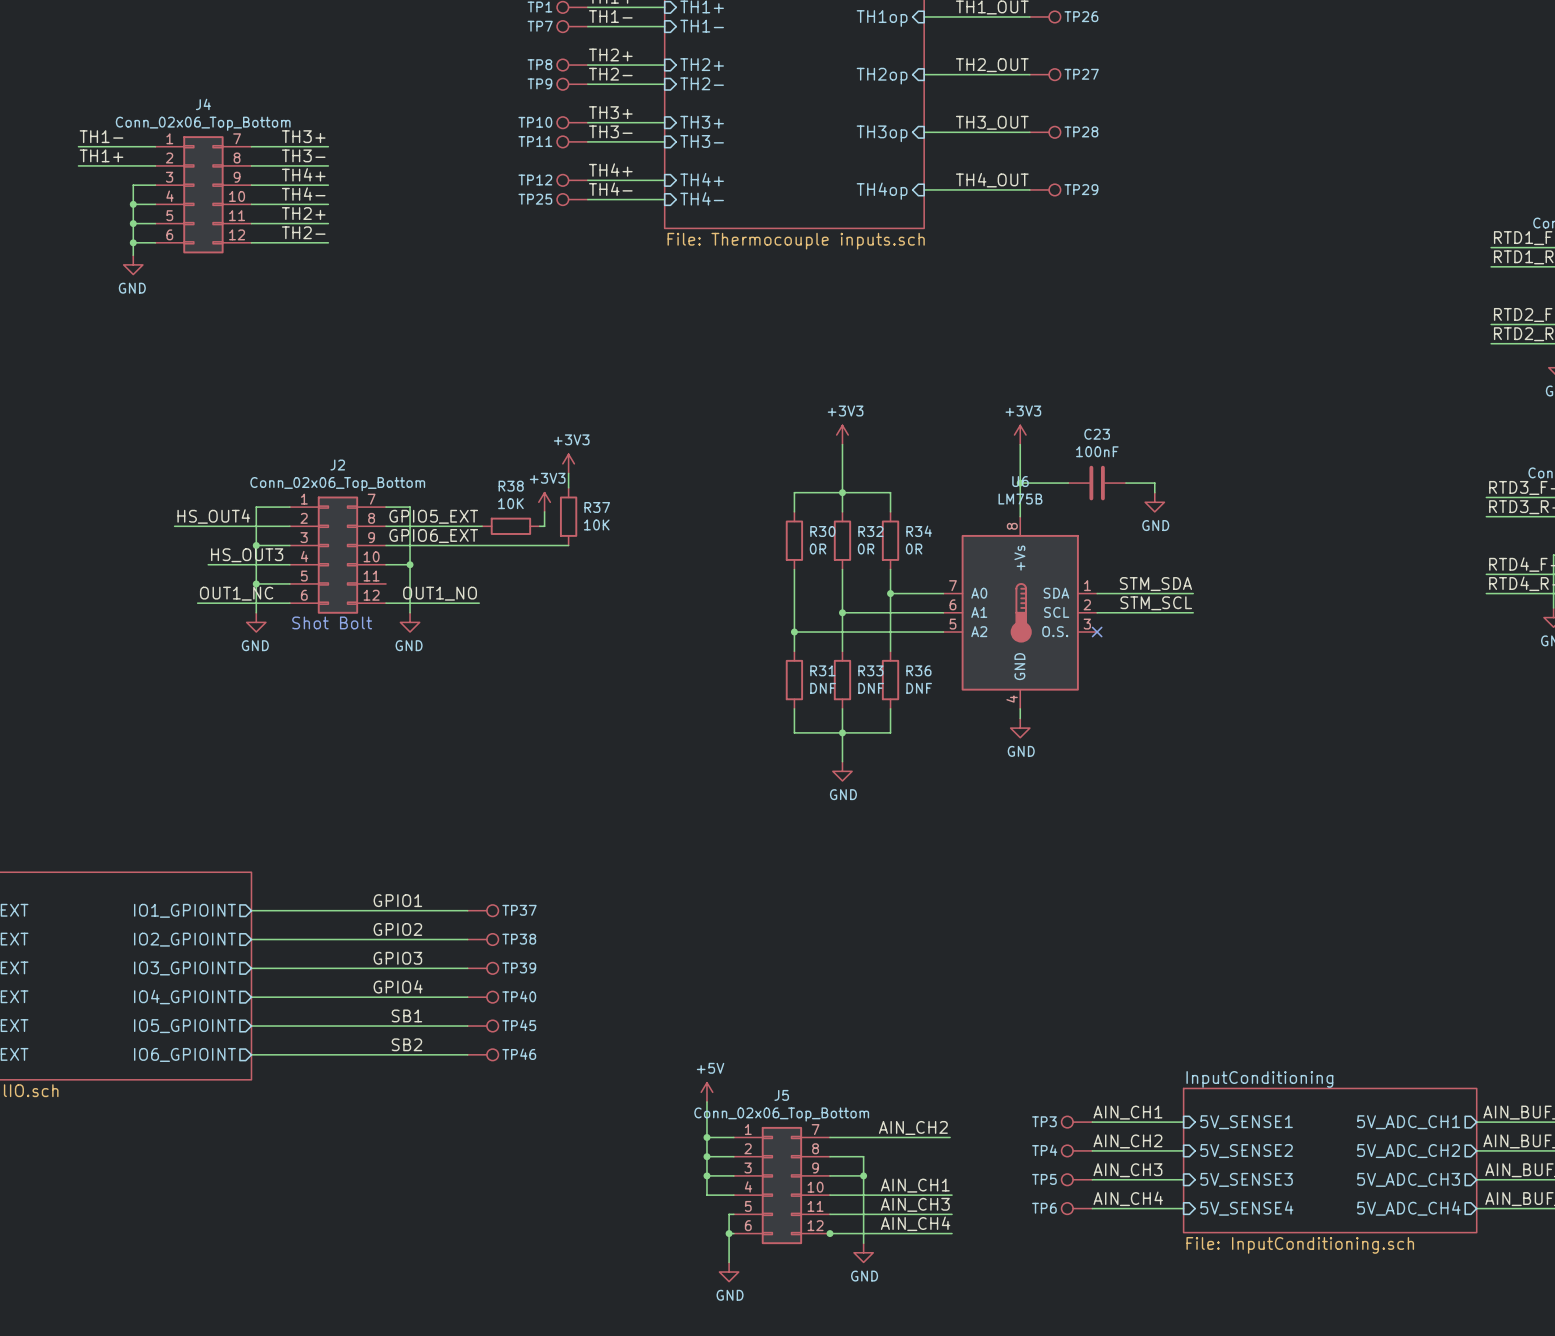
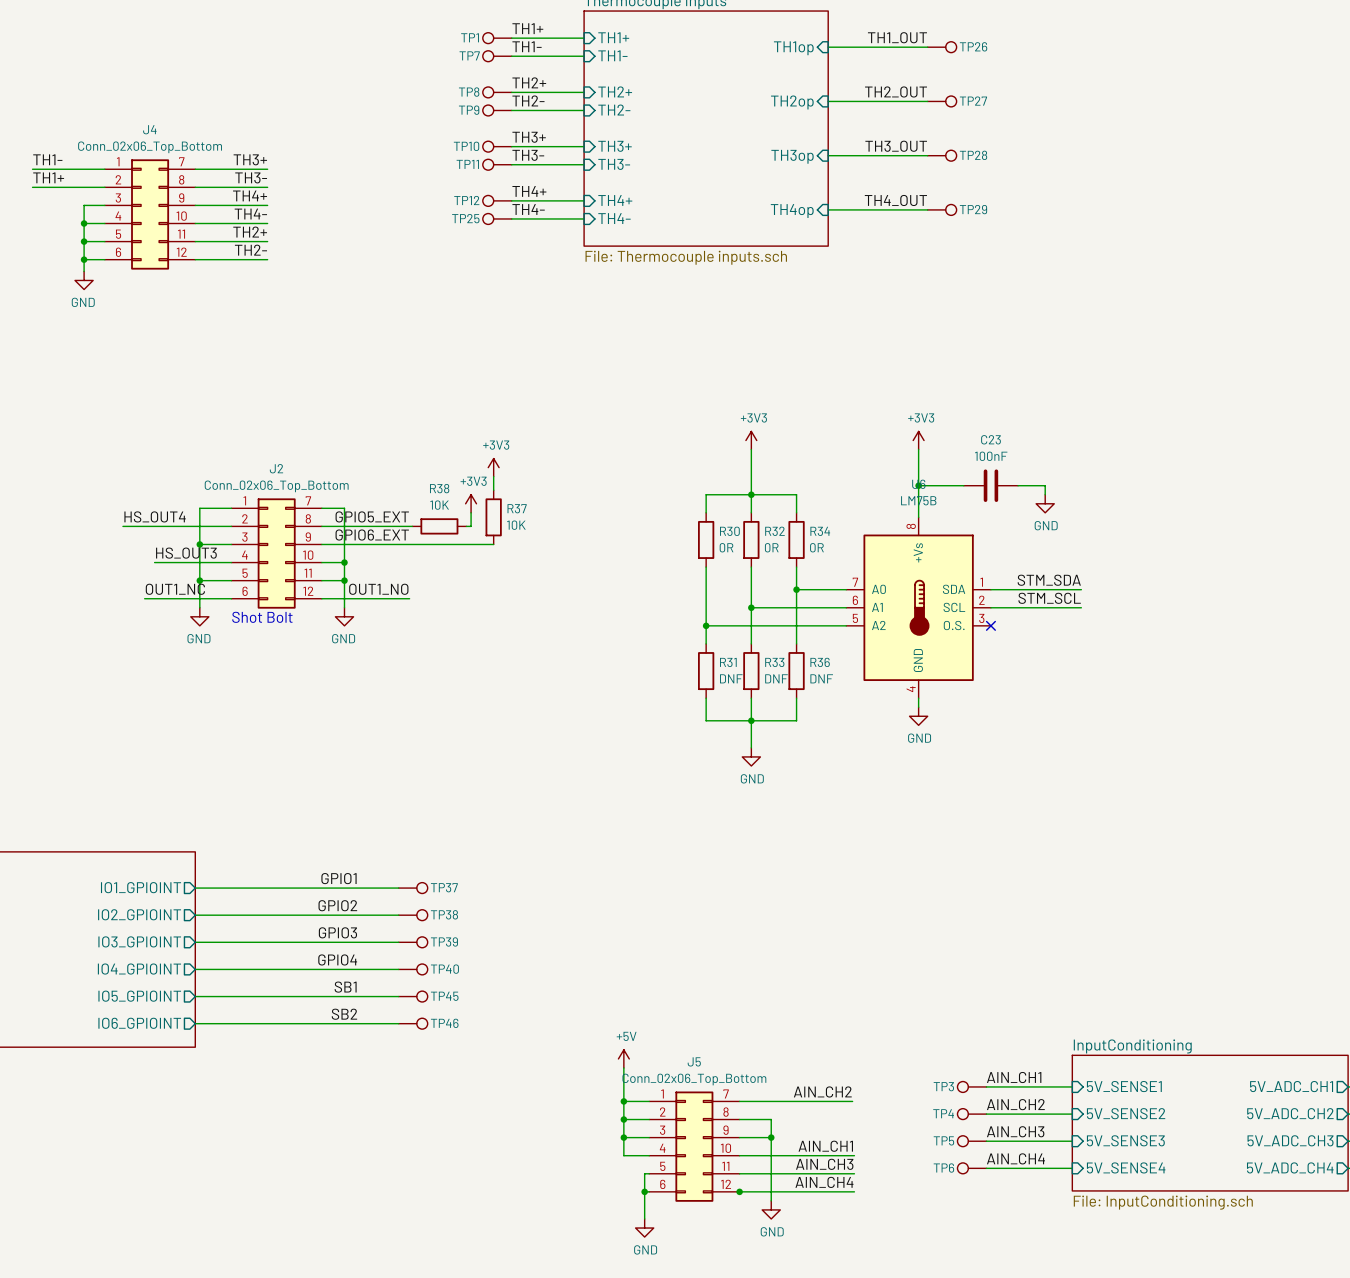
wire: none -> (321, 580) (344, 580)
junction: none -> (344, 580)

